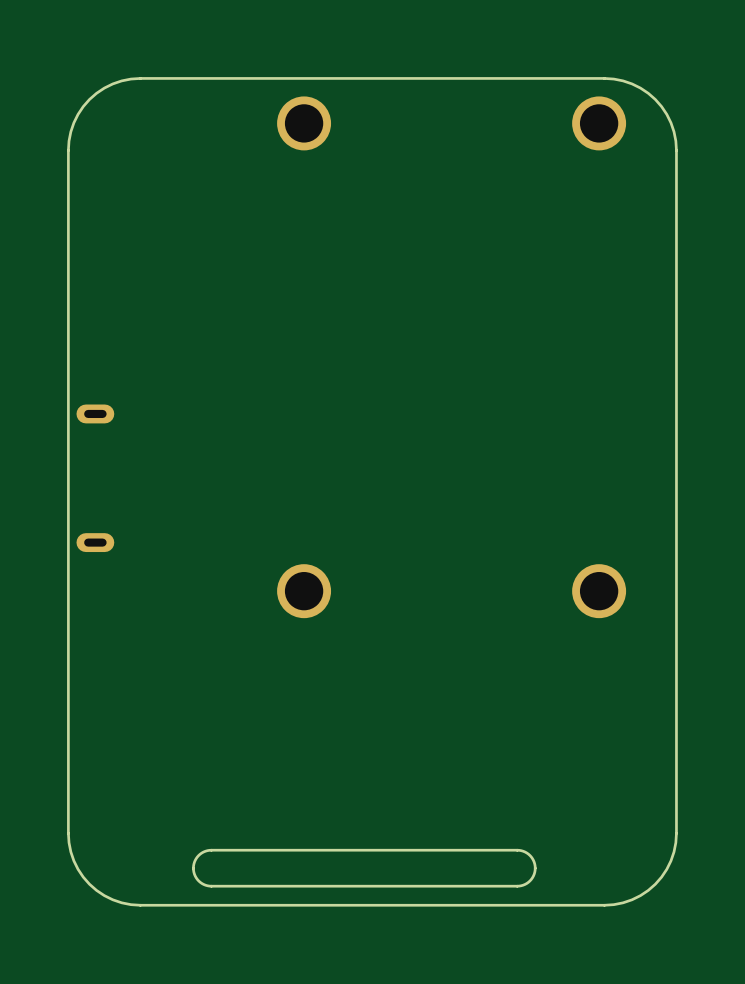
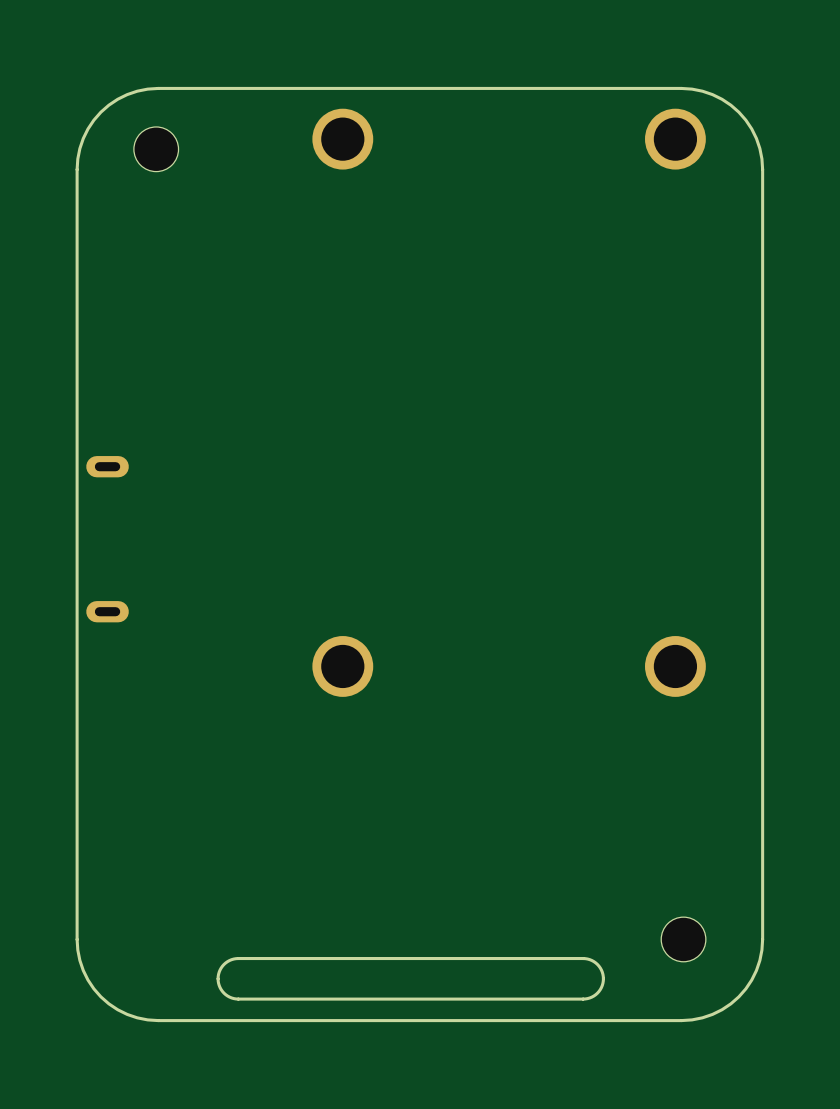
part: none -> (156, 149)
part: none -> (683, 939)

